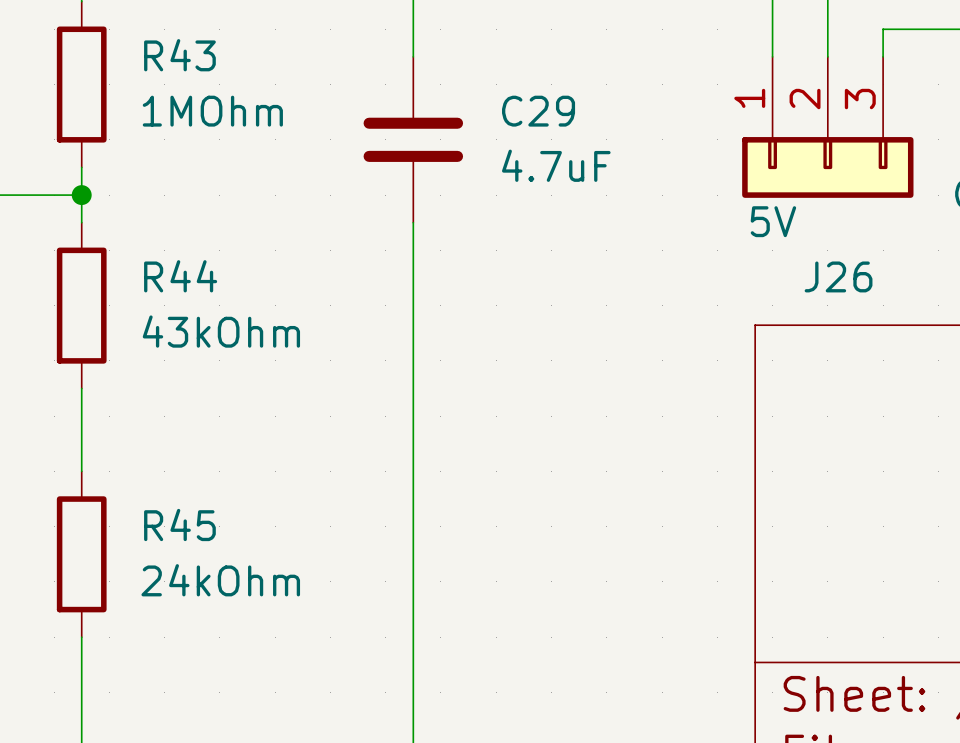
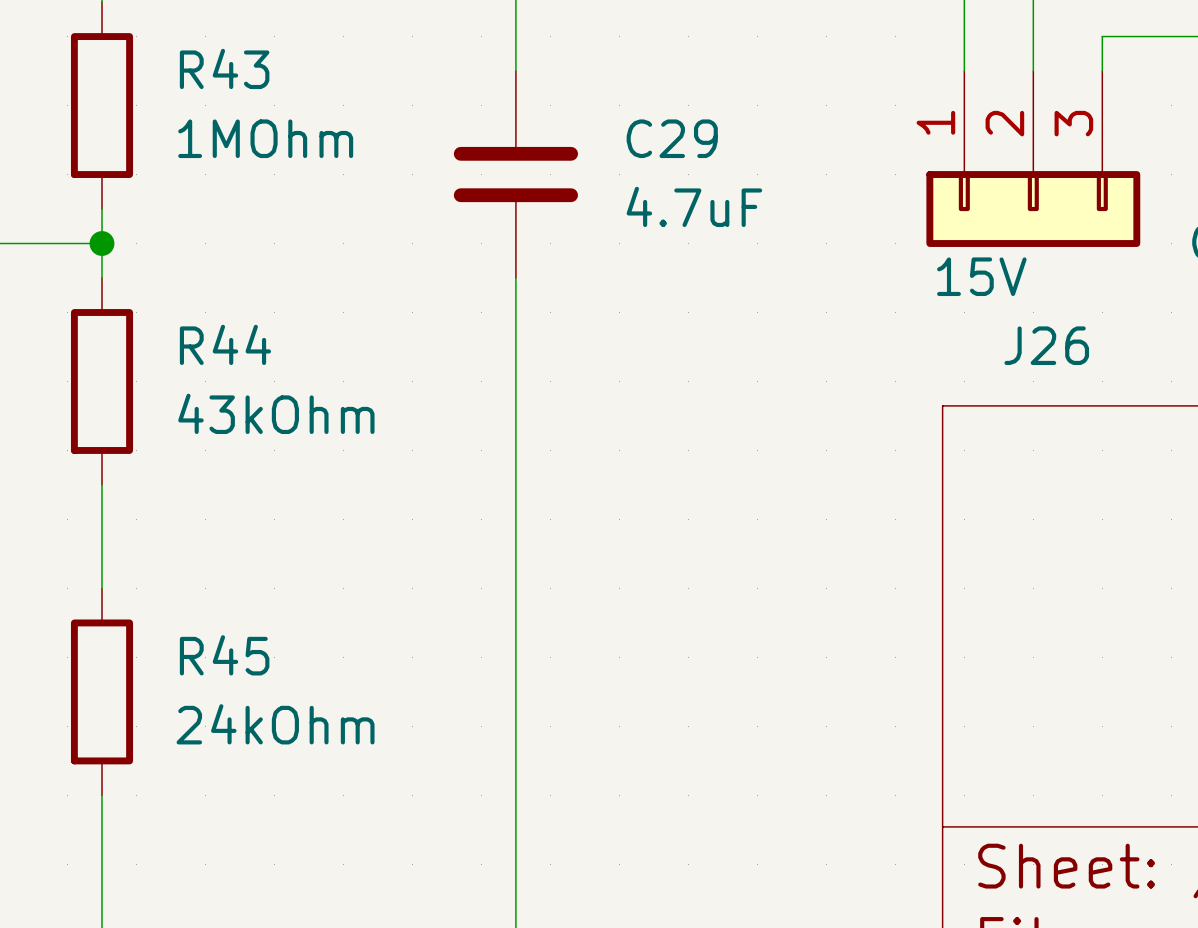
J26 value: 5V (773, 221) -> 15V (981, 276)

